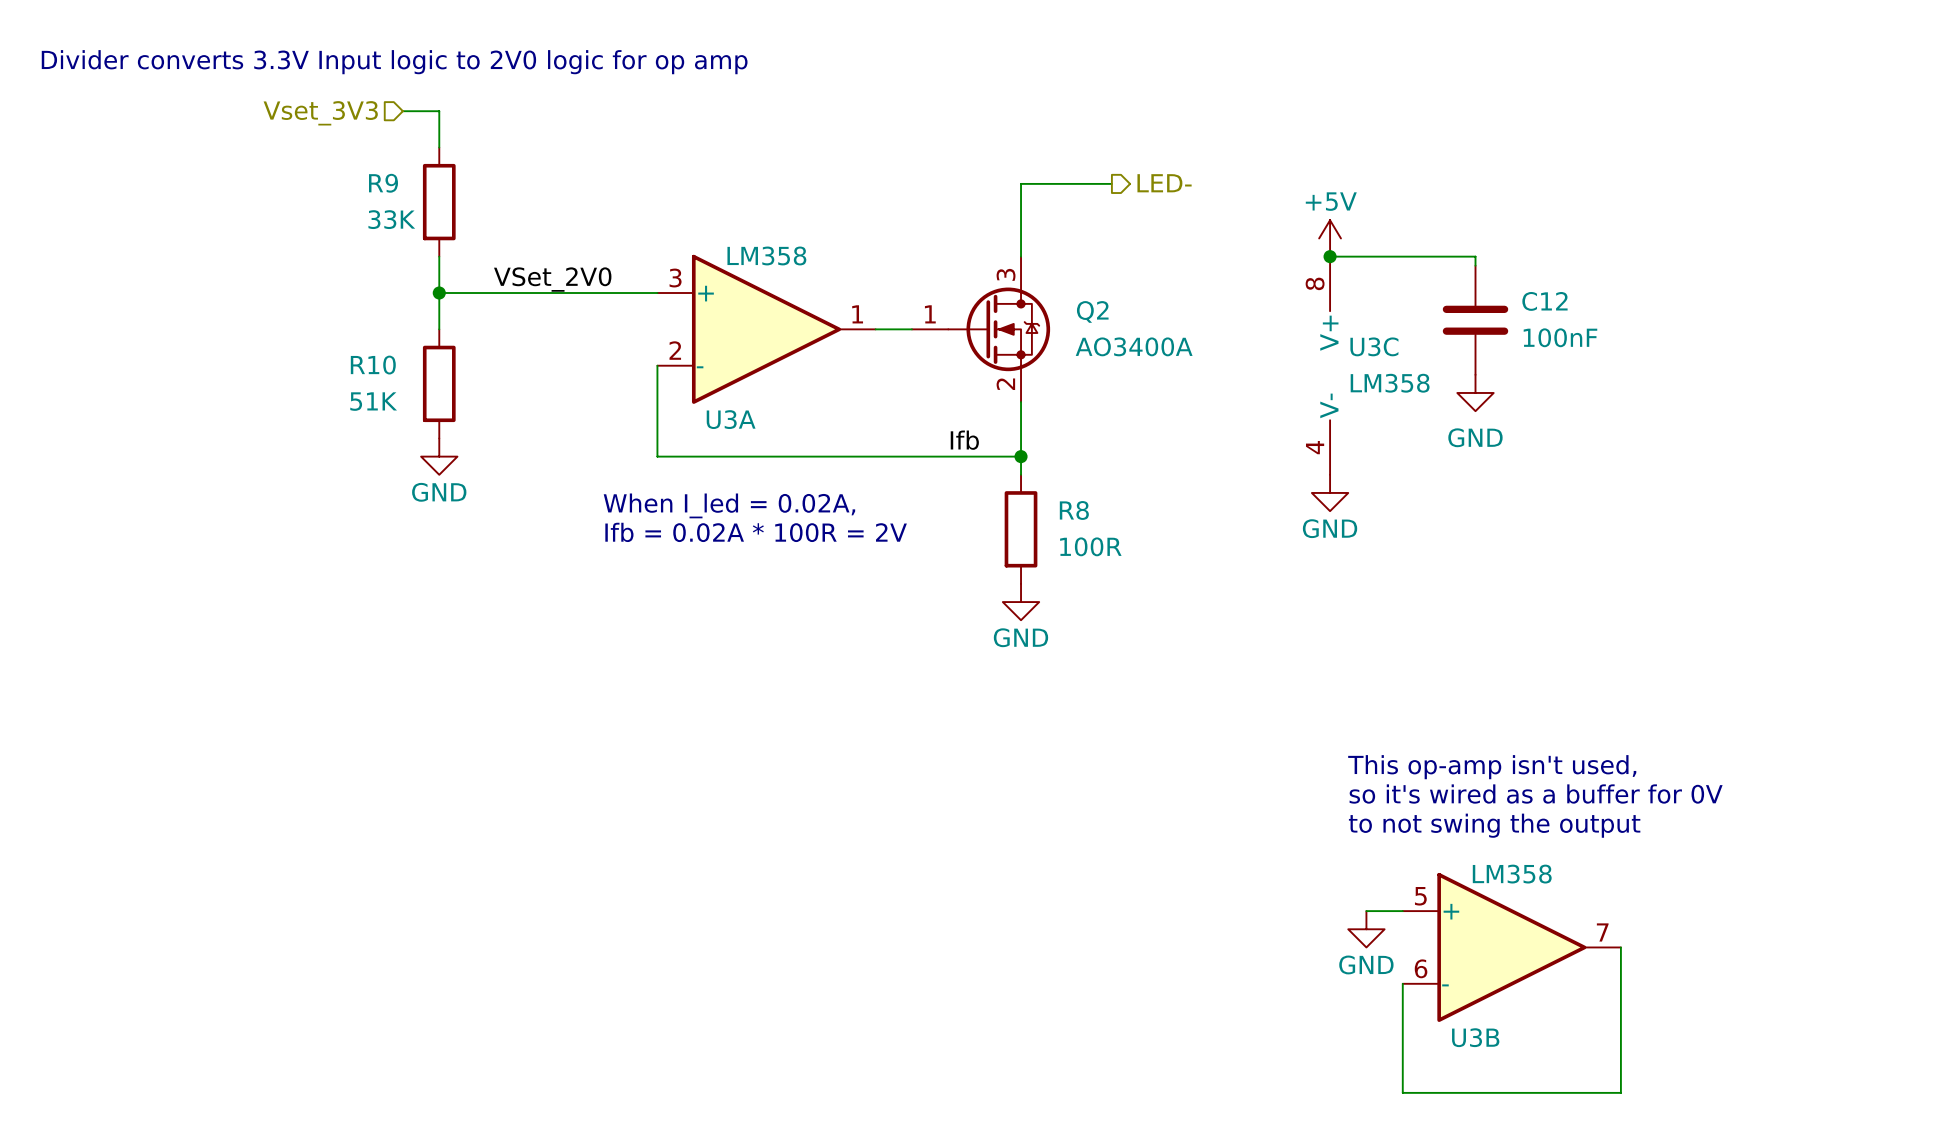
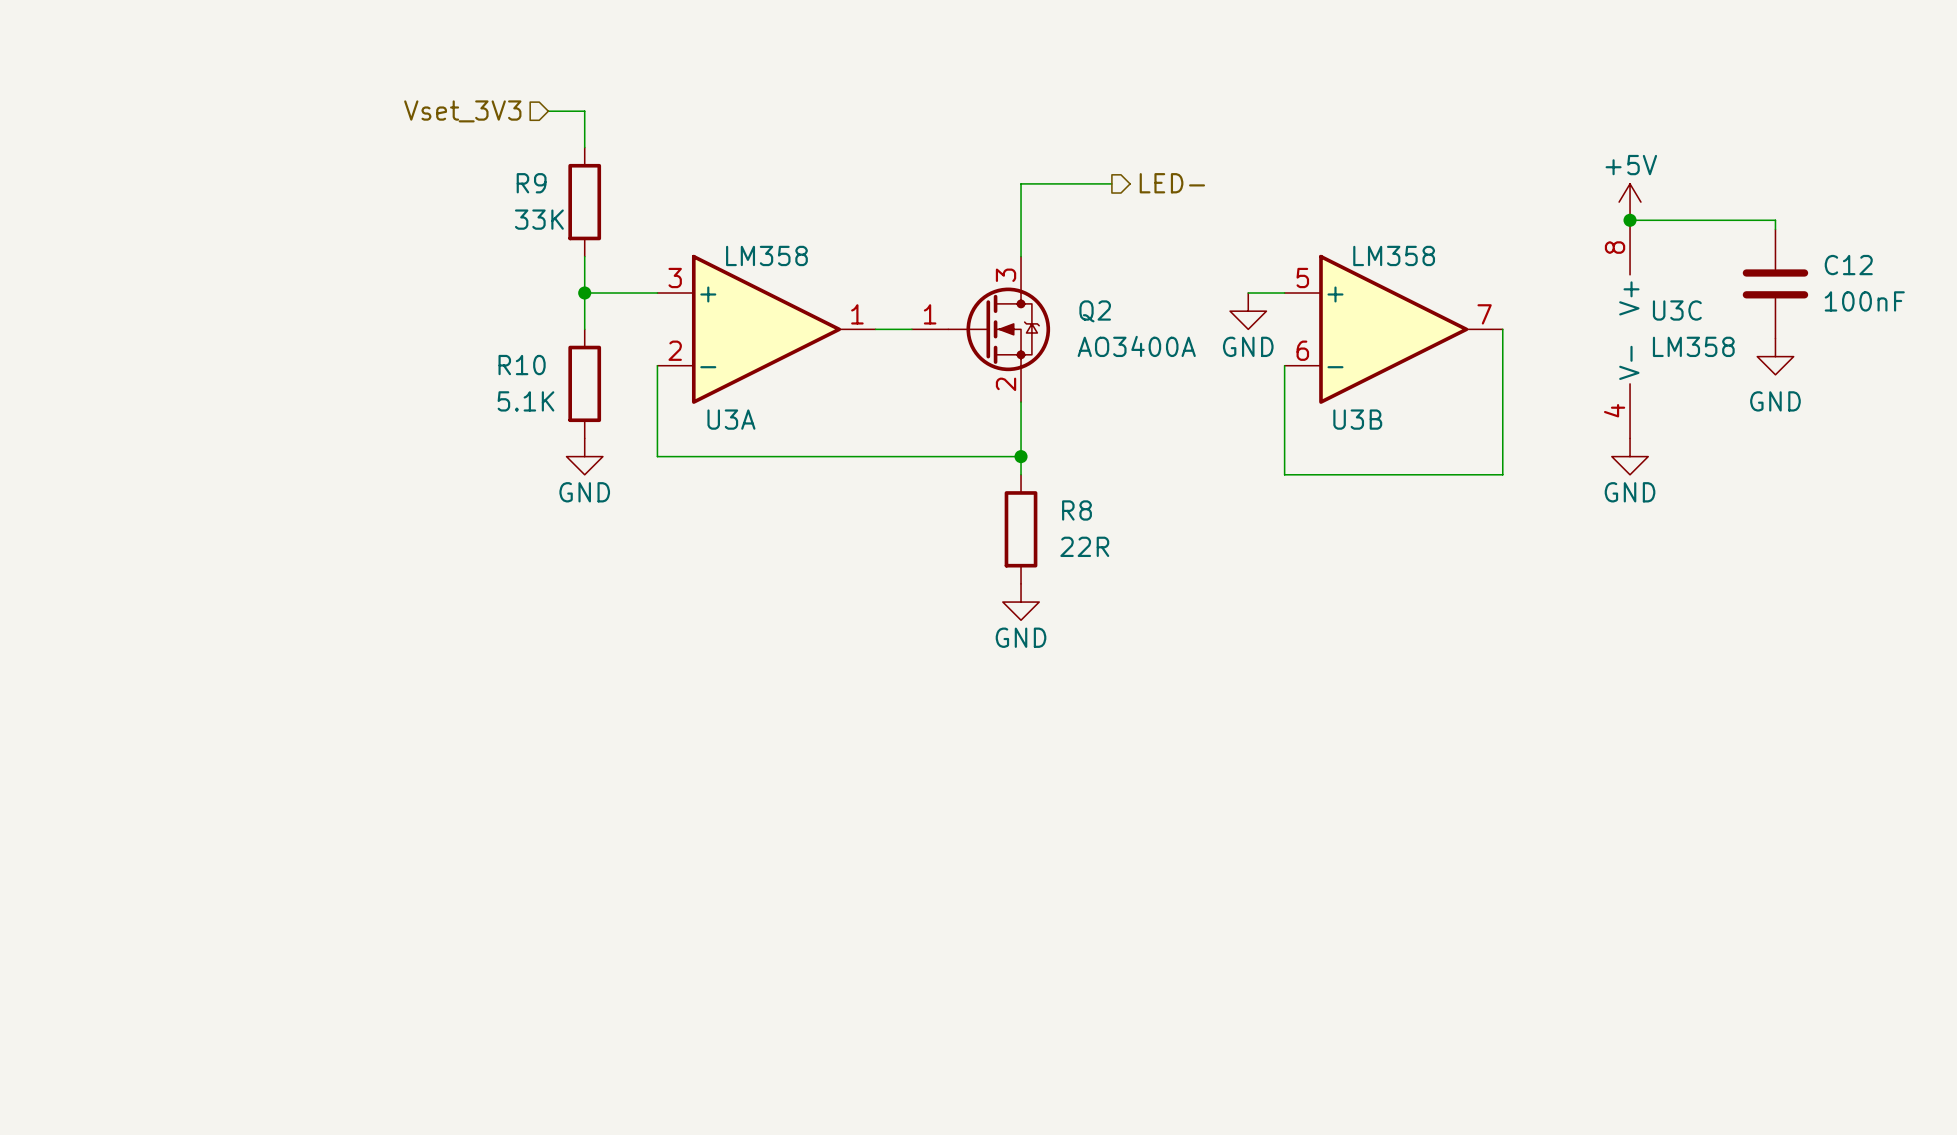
text: Divider converts 3.3V Input logic to 2V0 logic for op amp (394, 62) -> none
wire: (402, 111) (439, 111) (439, 147) -> (548, 111) (584, 111) (584, 147)
hierarchical label position: Vset_3V3 (320, 113) -> Vset_3V3 (462, 111)
R9 position: (439, 202) -> (584, 202)
junction: none -> (1630, 220)
power symbol position: +5V (1330, 238) -> +5V (1630, 202)
wire: (439, 256) (439, 329) -> (584, 256) (584, 329)
wire: (1330, 256) (1475, 256) (1475, 265) -> (1630, 220) (1775, 220) (1775, 229)
junction: (1330, 256) -> none
label: VSet_2V0 (552, 279) -> none
wire: (439, 293) (584, 293) -> none
junction: (439, 293) -> none
junction: none -> (584, 293)
wire: none -> (1248, 293) (1284, 293)
power symbol: none -> GND (1248, 311)
C12 position: (1475, 320) -> (1775, 283)
wire: none -> (1502, 329) (1502, 474) (1284, 474) (1284, 365)
power symbol: none -> GND (1775, 356)
U3C position: (1330, 365) -> (1630, 329)
R10 position: (439, 383) -> (584, 383)
power symbol: GND (1475, 392) -> none
R10 value: 51K (373, 401) -> 5.1K (525, 401)
label: Ifb (964, 440) -> none
power symbol position: GND (439, 456) -> GND (584, 456)
power symbol: none -> GND (1630, 456)
power symbol: GND (1330, 492) -> none
text: When I_led = 0.02A, (729, 505) -> none
text: Ifb = 0.02A * 100R = 2V (756, 532) -> none
R8 value: 100R (1090, 546) -> 22R (1084, 546)
text: This op-amp isn't used, (1492, 767) -> none
text: so it's wired as a buffer for 0V (1536, 794) -> none
text: to not swing the output (1494, 825) -> none
wire: (1366, 911) (1402, 911) -> none
power symbol: GND (1366, 929) -> none
U3B position: (1511, 947) -> (1393, 329)
wire: (1620, 947) (1620, 1092) (1402, 1092) (1402, 983) -> none

